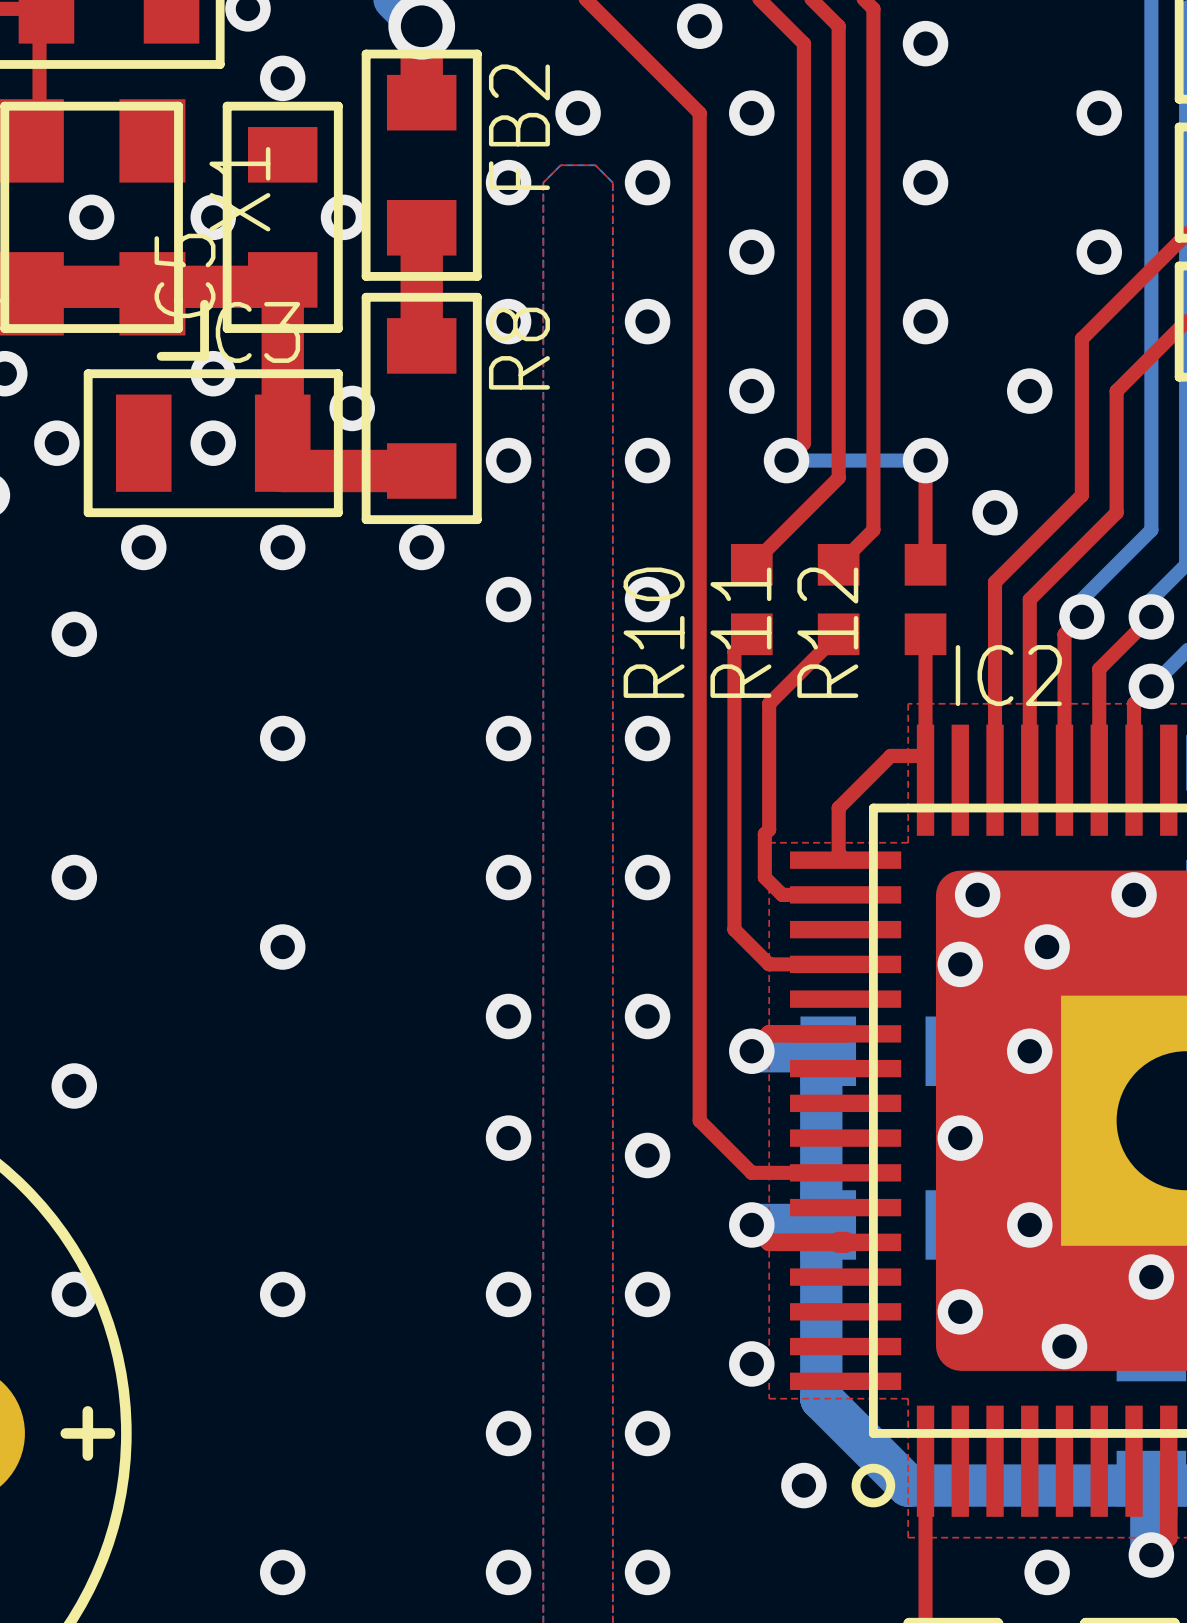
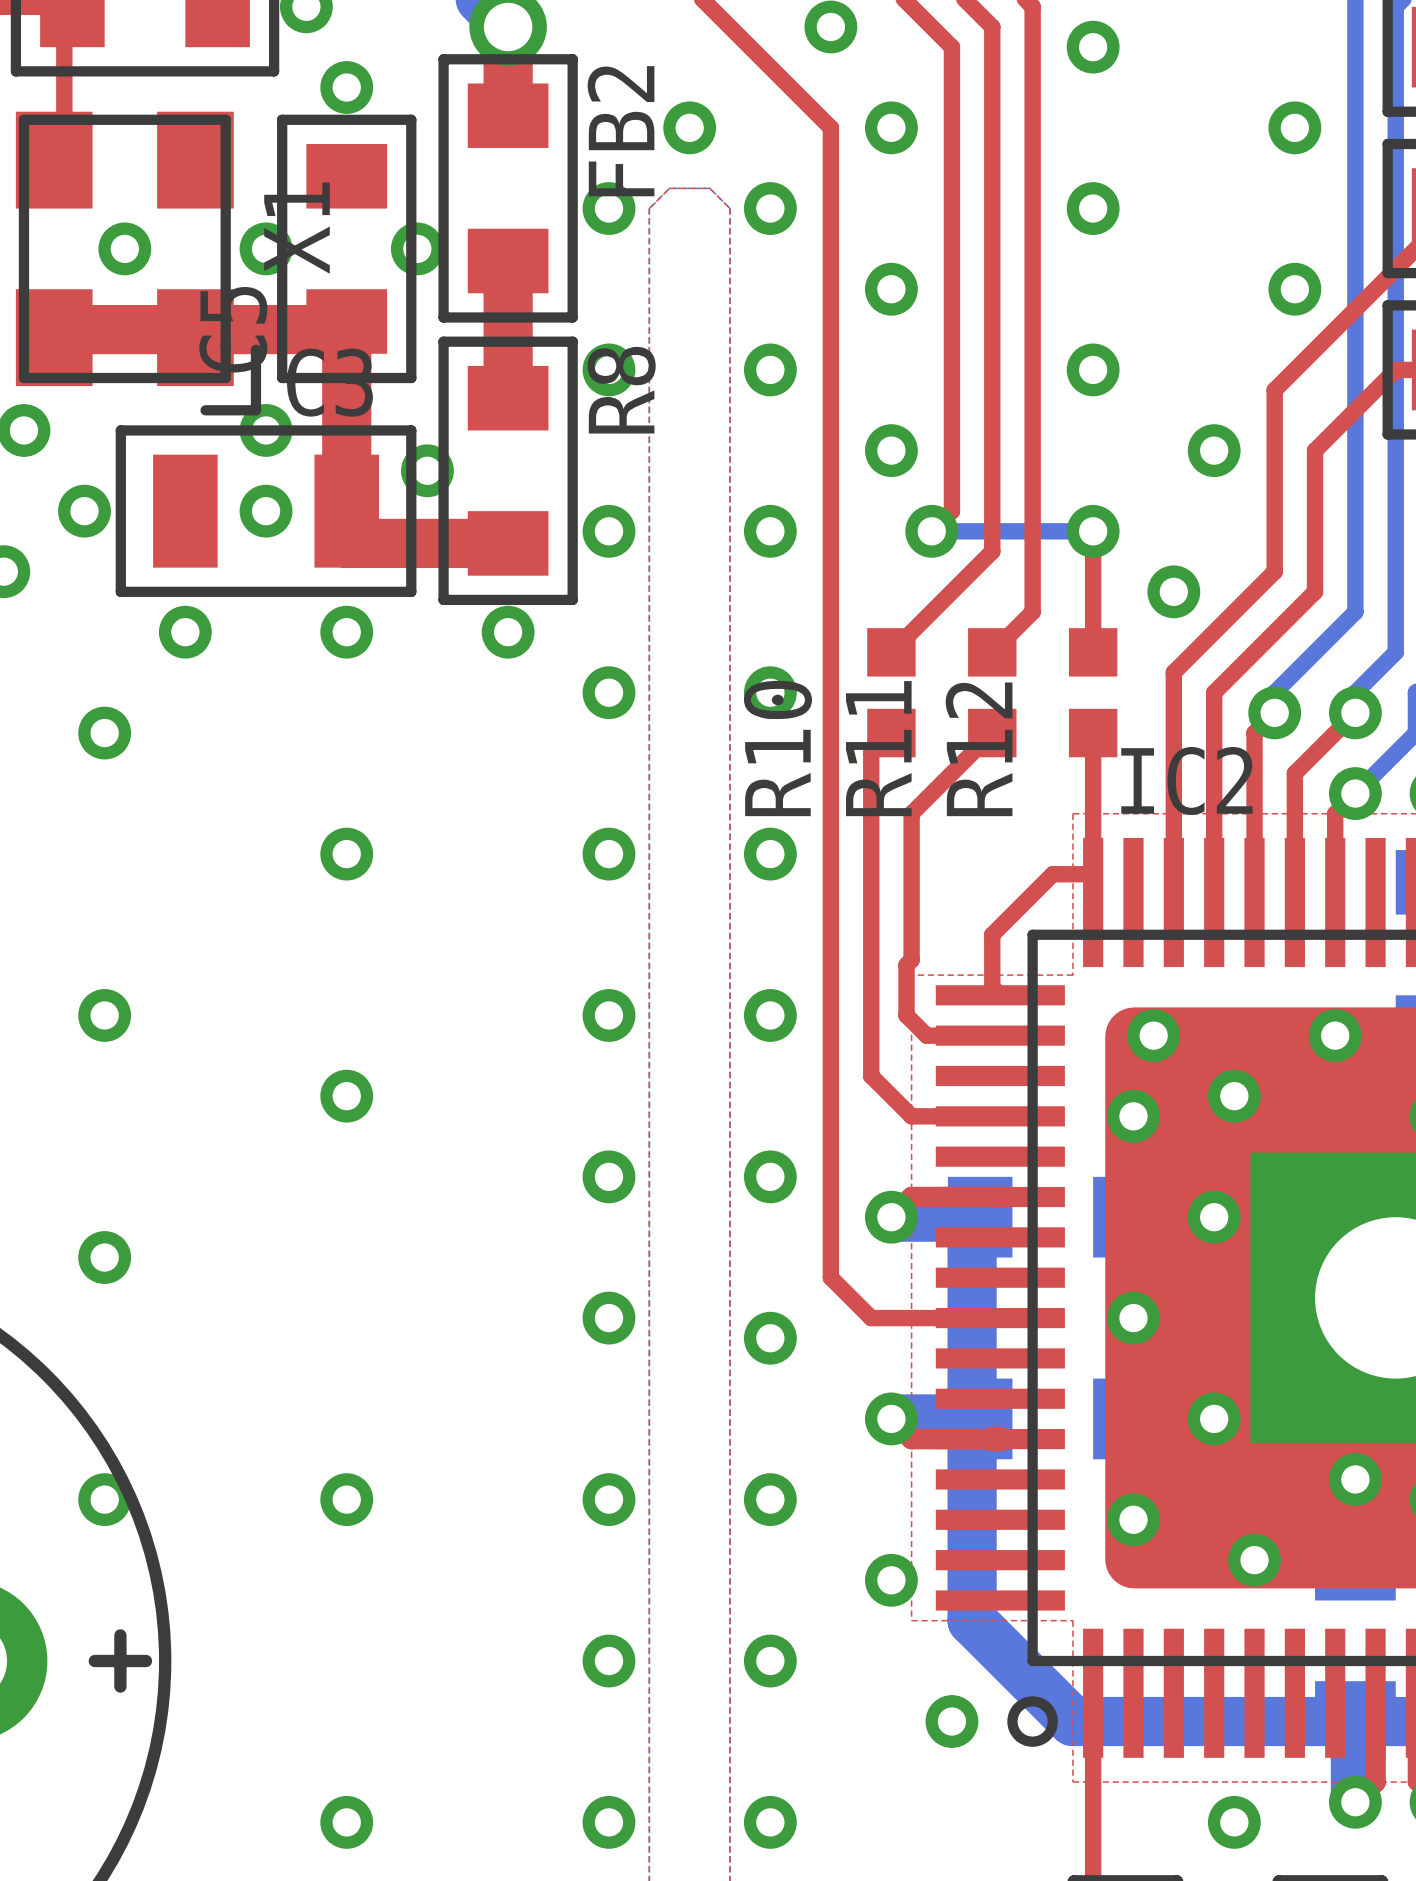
top track: (699, 1103) (699, 1120) (751, 1172) (845, 1172) -> (830, 1277) (871, 1318) (1000, 1318)

